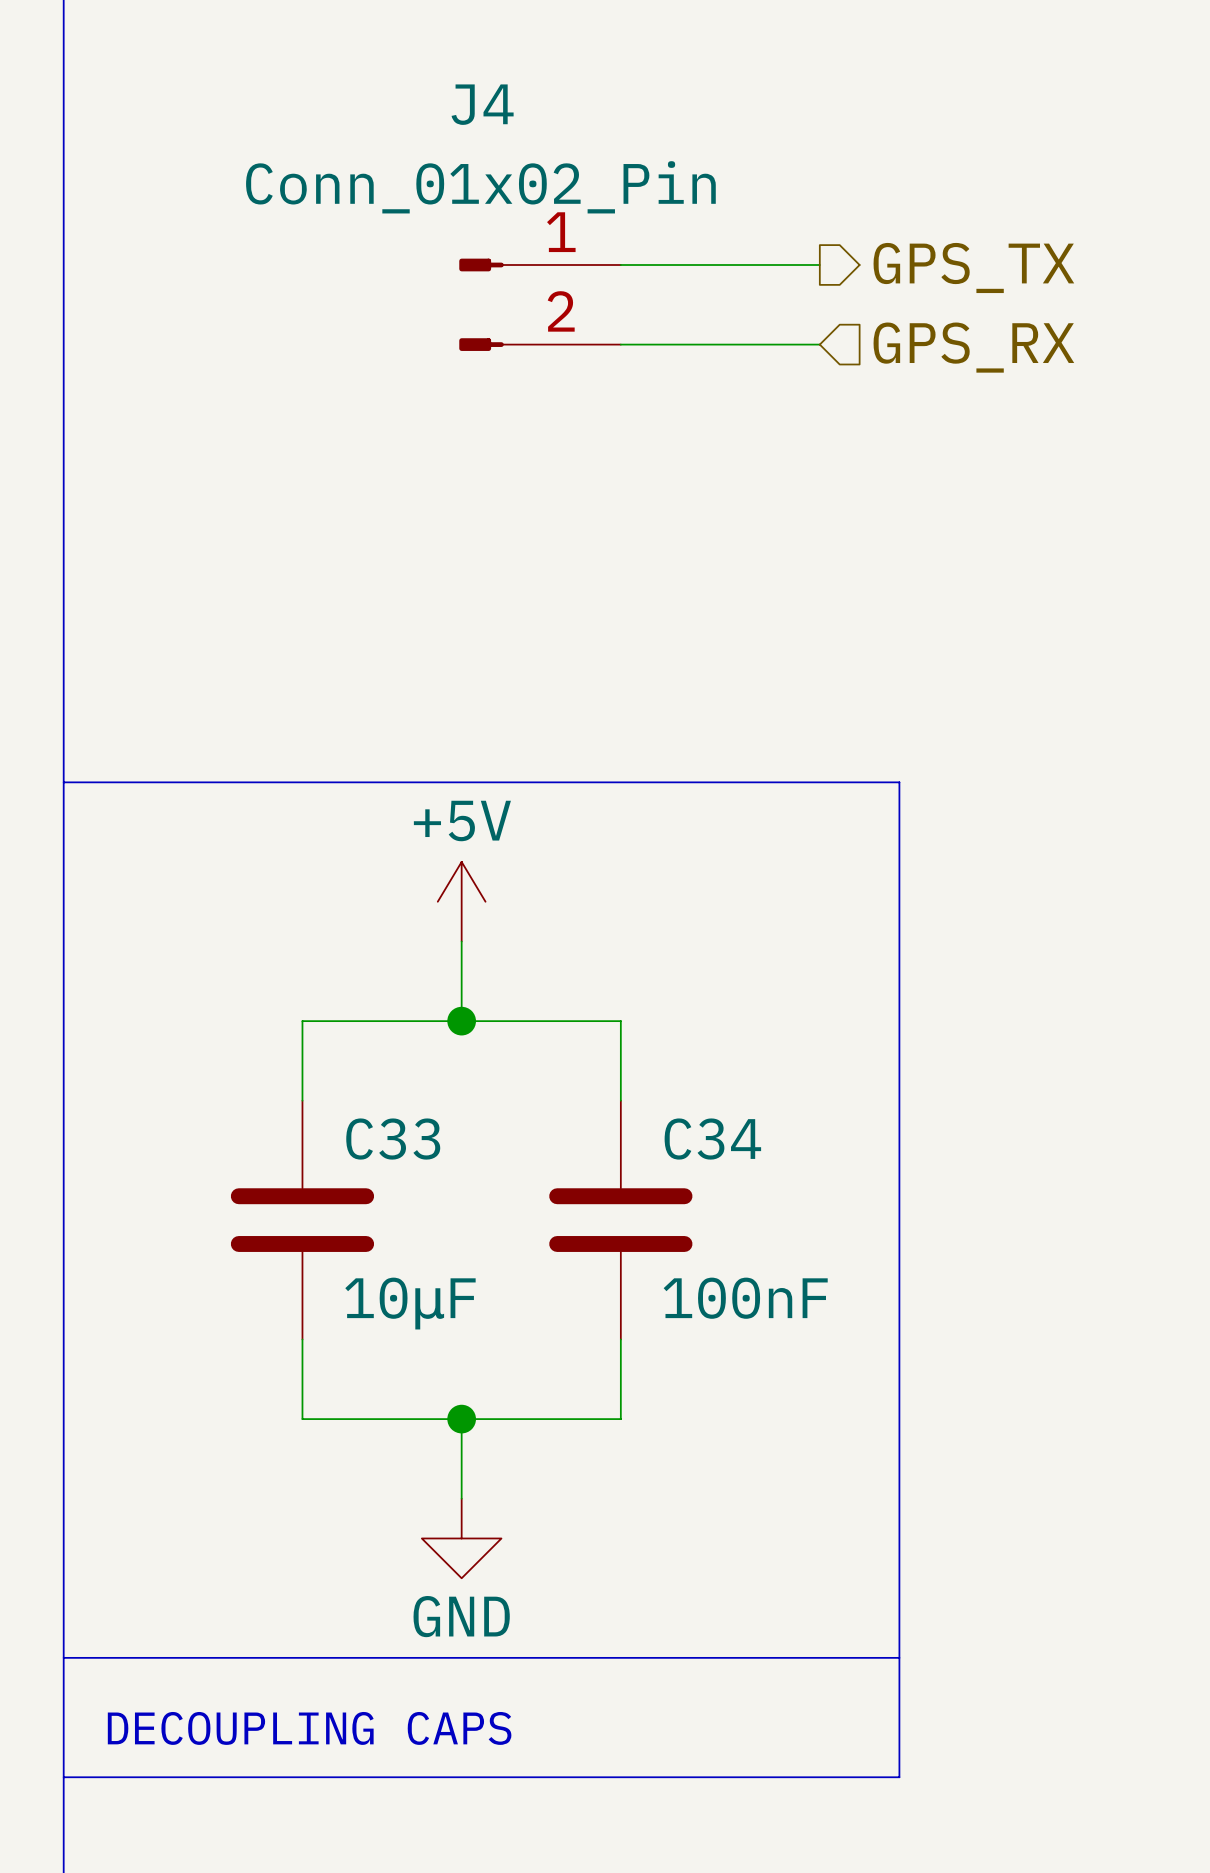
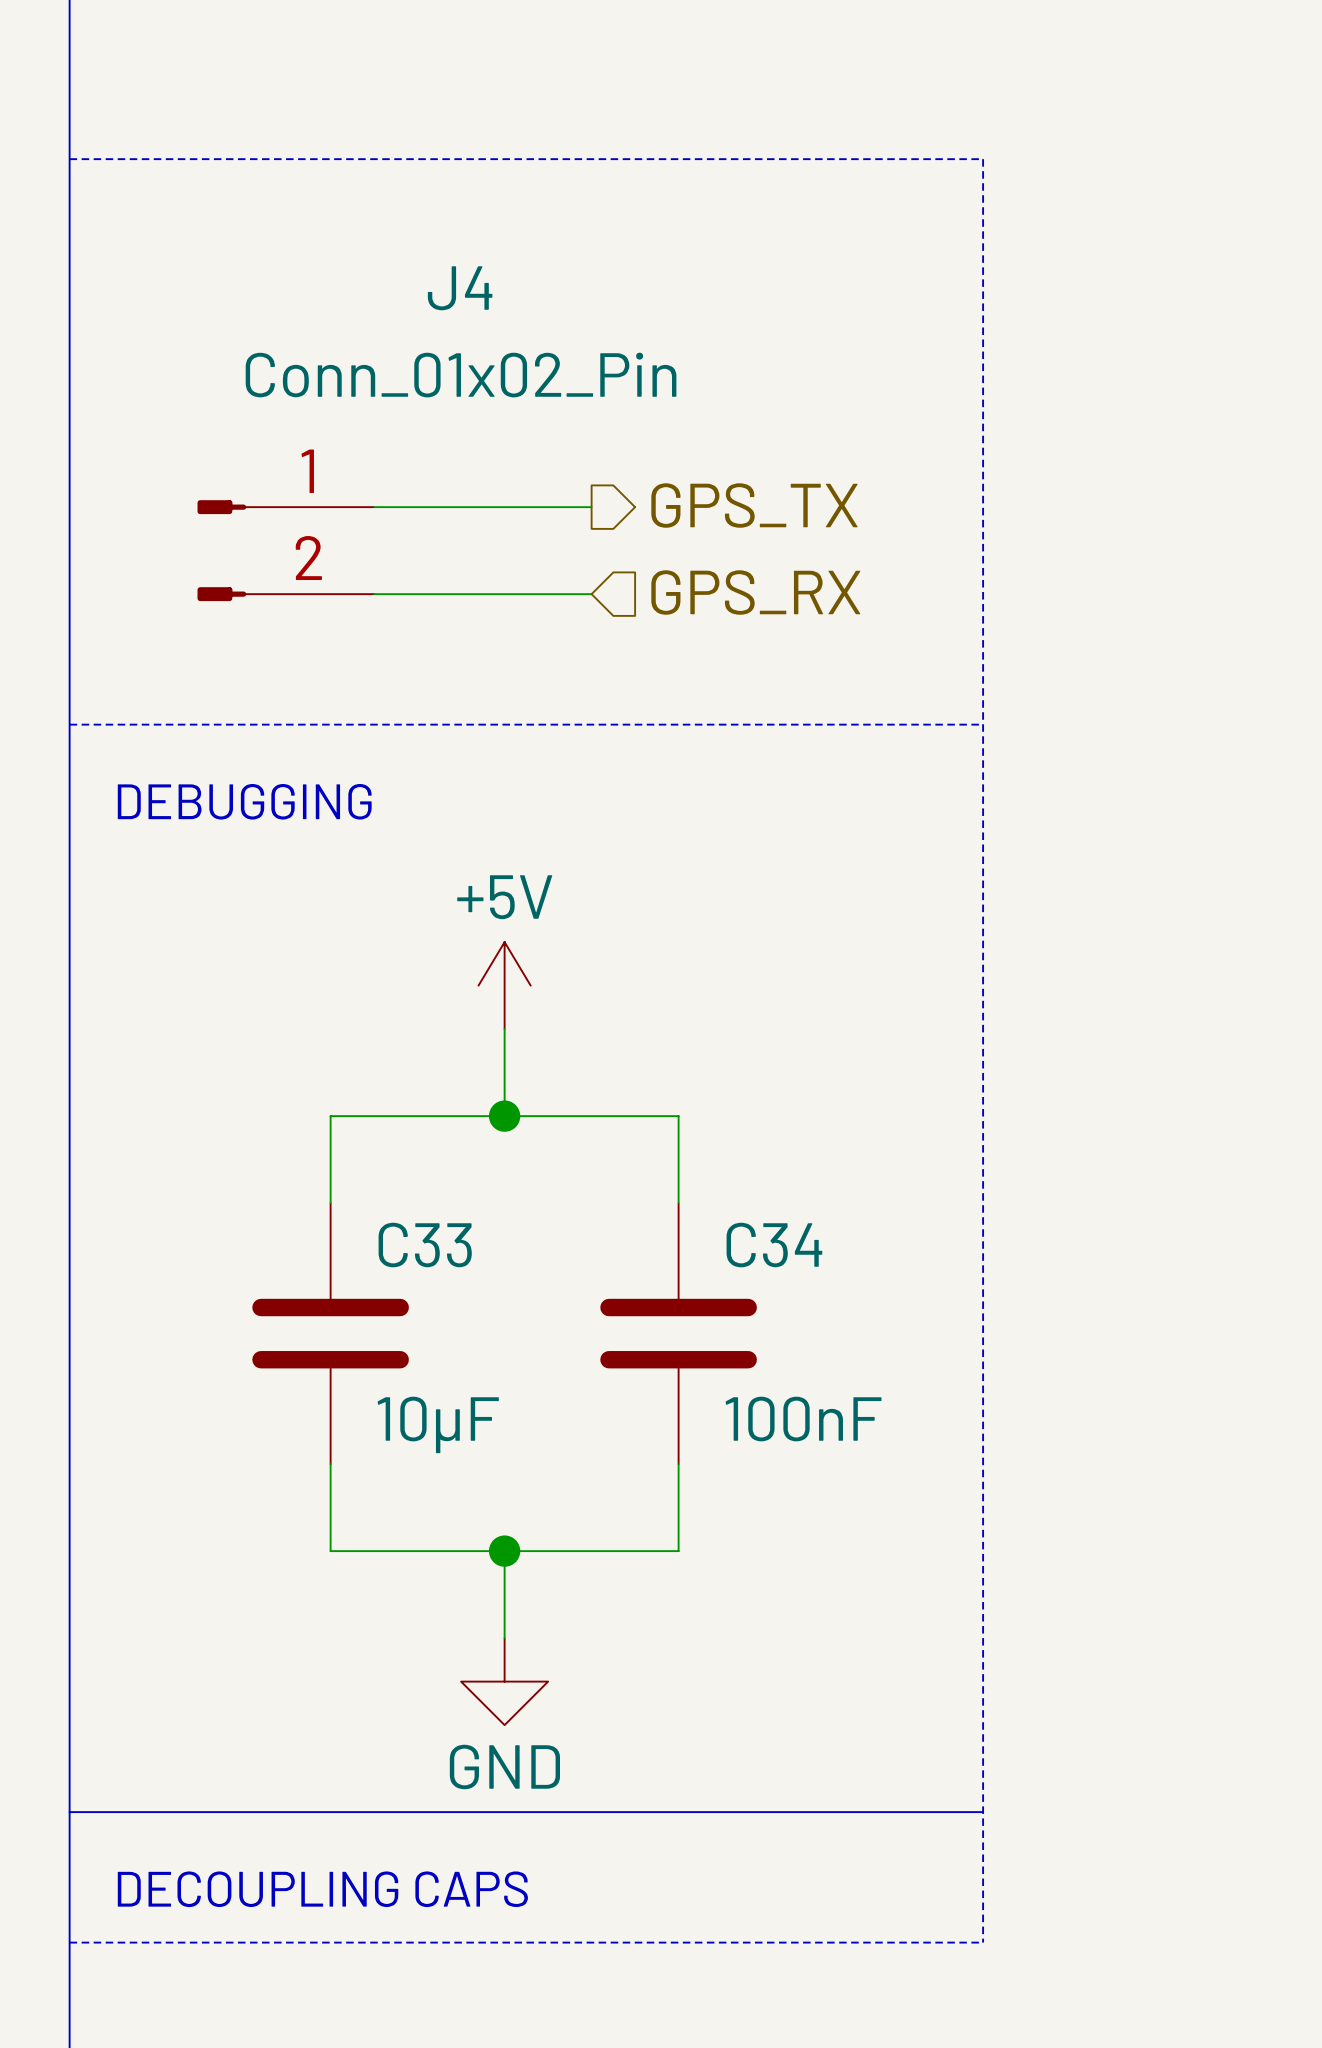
J4 name position: J4 (482, 104) -> J4 (460, 288)
J4 value position: Conn_01x02_Pin (480, 187) -> Conn_01x02_Pin (461, 375)
wire: (620, 265) (819, 265) -> (374, 594) (591, 594)
hierarchical label position: GPS_TX (973, 267) -> GPS_TX (754, 505)
J4 position: (540, 304) -> (285, 550)
wire: (620, 344) (819, 344) -> (374, 507) (591, 507)
hierarchical label position: GPS_RX (973, 347) -> GPS_RX (755, 592)
line: none -> (69, 724) (983, 724)
text: none -> DEBUGGING (244, 801)
line: (63, 782) (899, 782) (899, 1777) (63, 1777) -> (69, 159) (983, 159) (983, 1942) (69, 1942)

